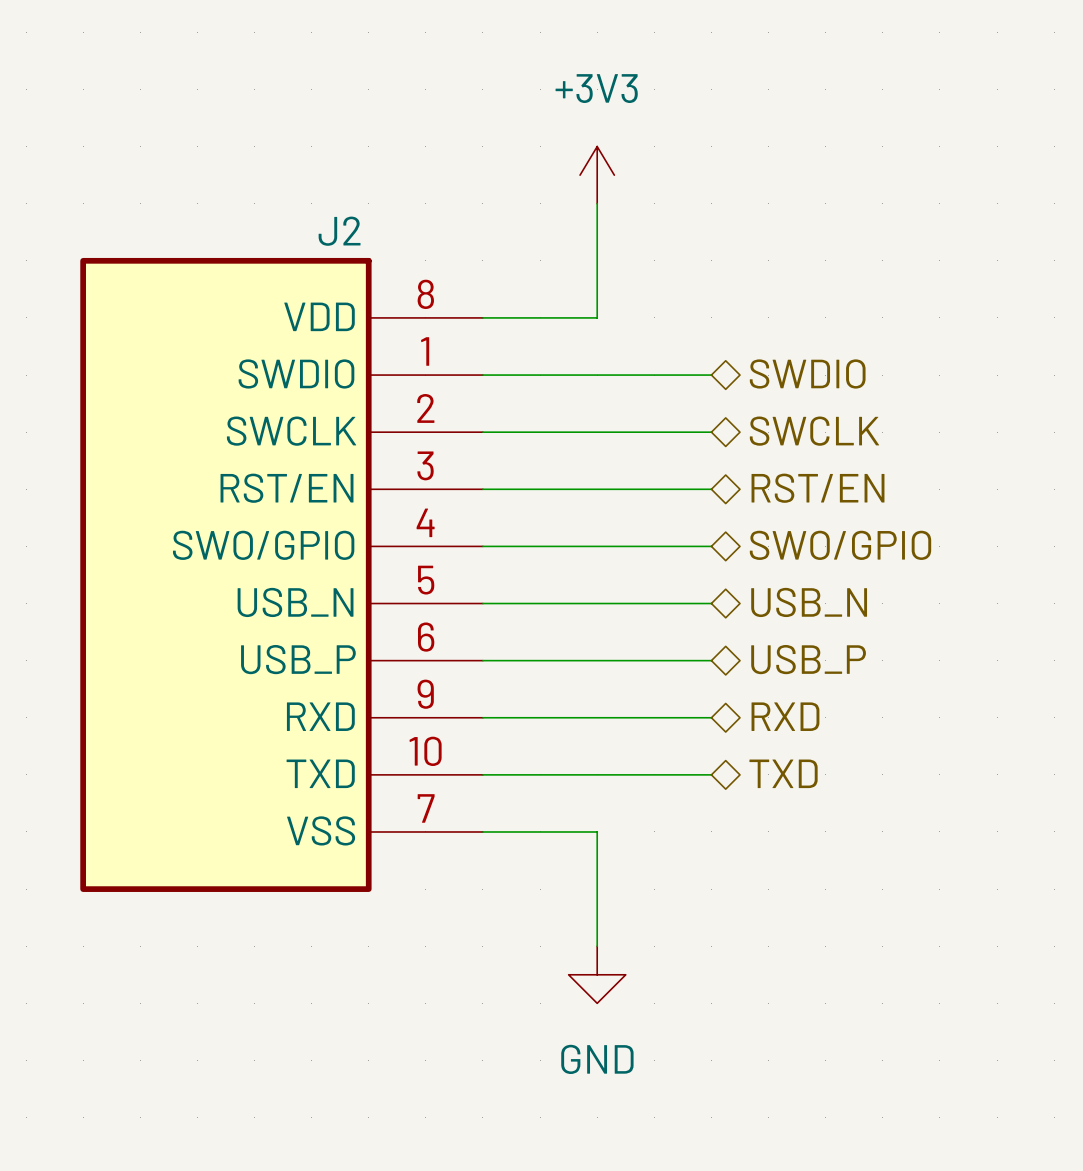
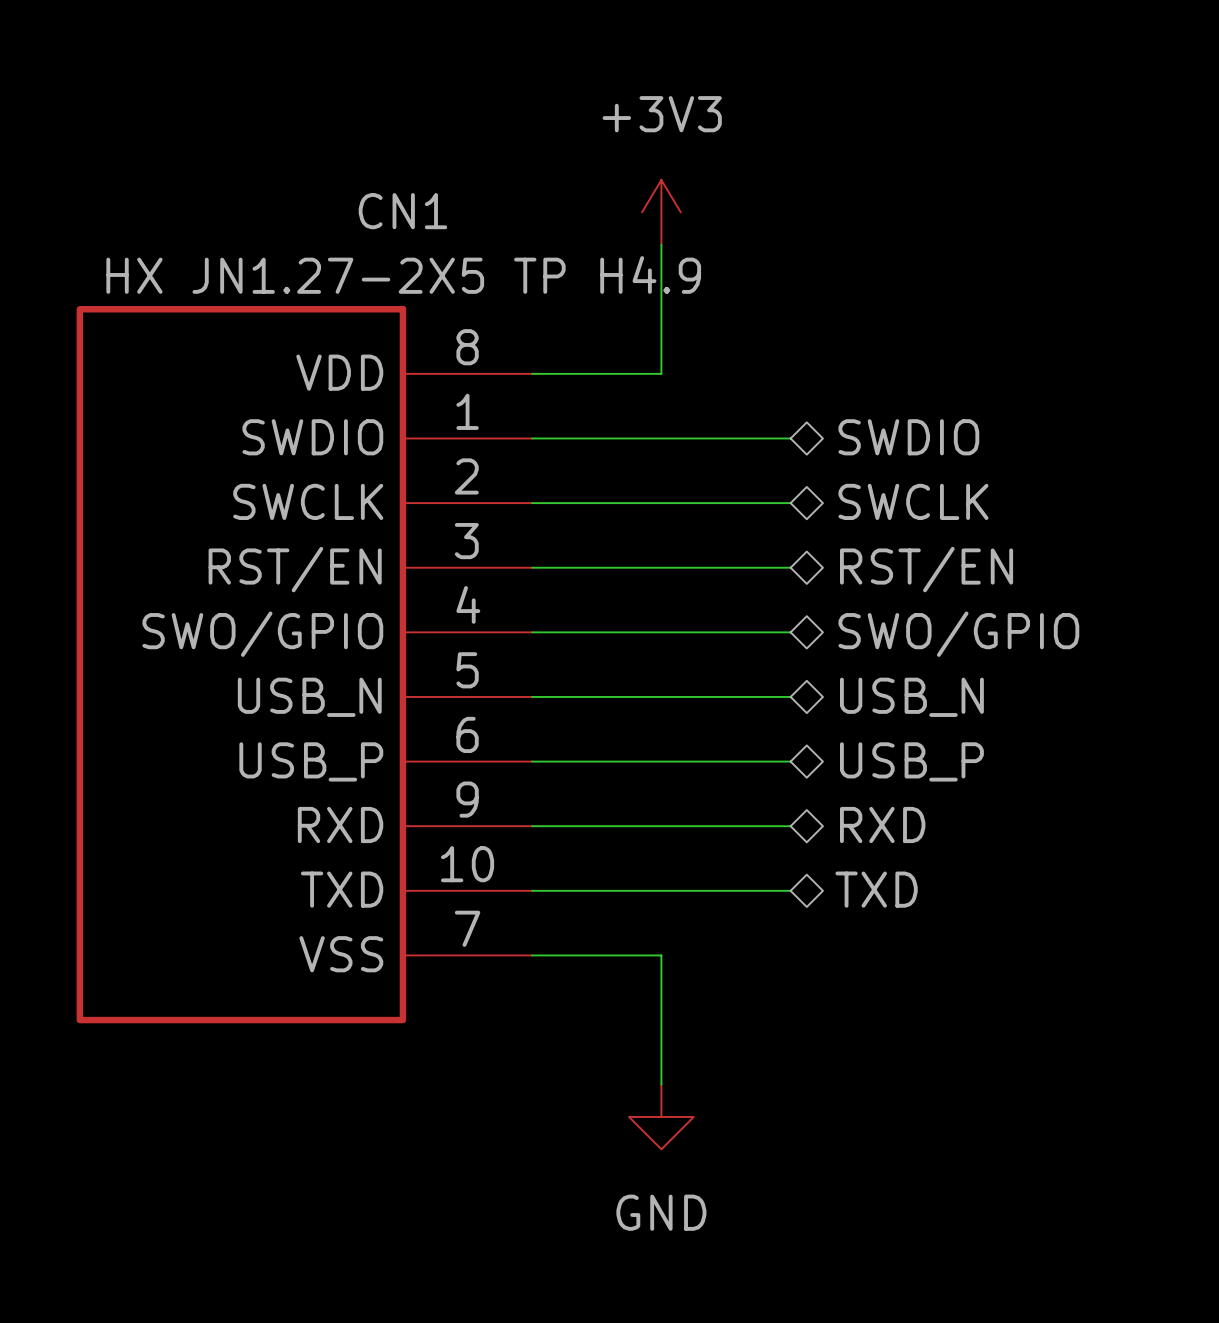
J2 name: J2 (339, 231) -> CN1 (402, 211)
J2 value: none -> HX JN1.27-2X5 TP H4.9 (403, 274)

